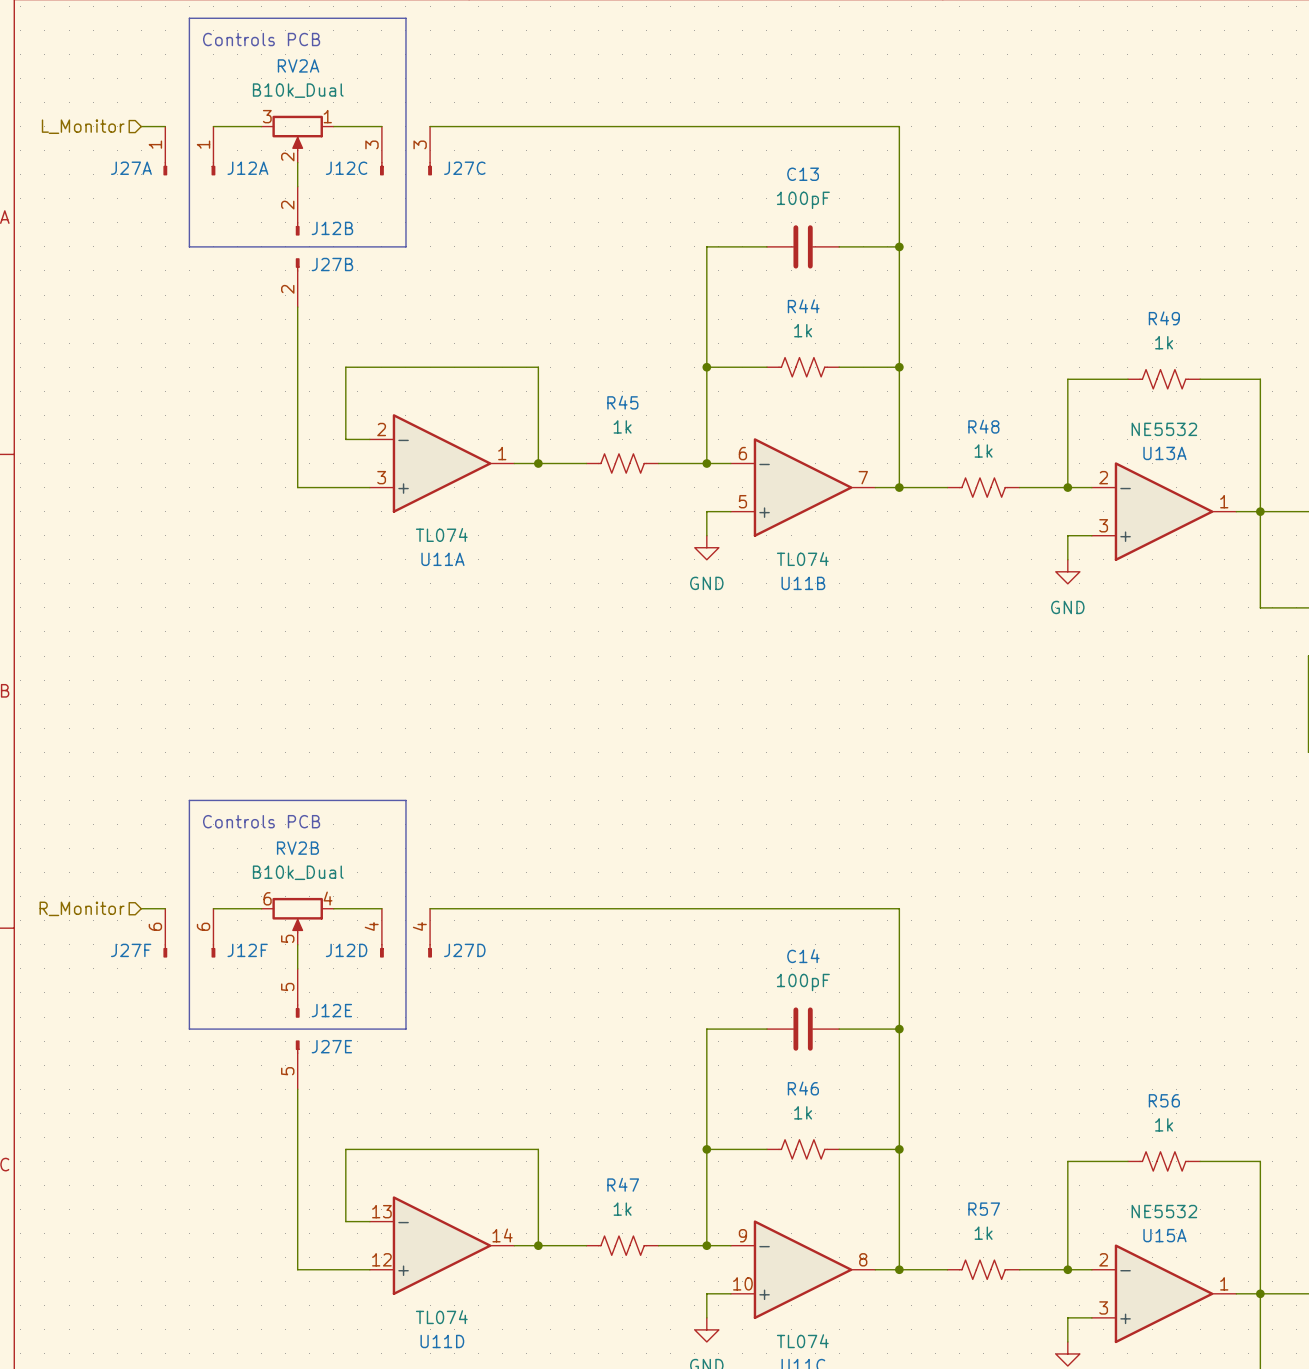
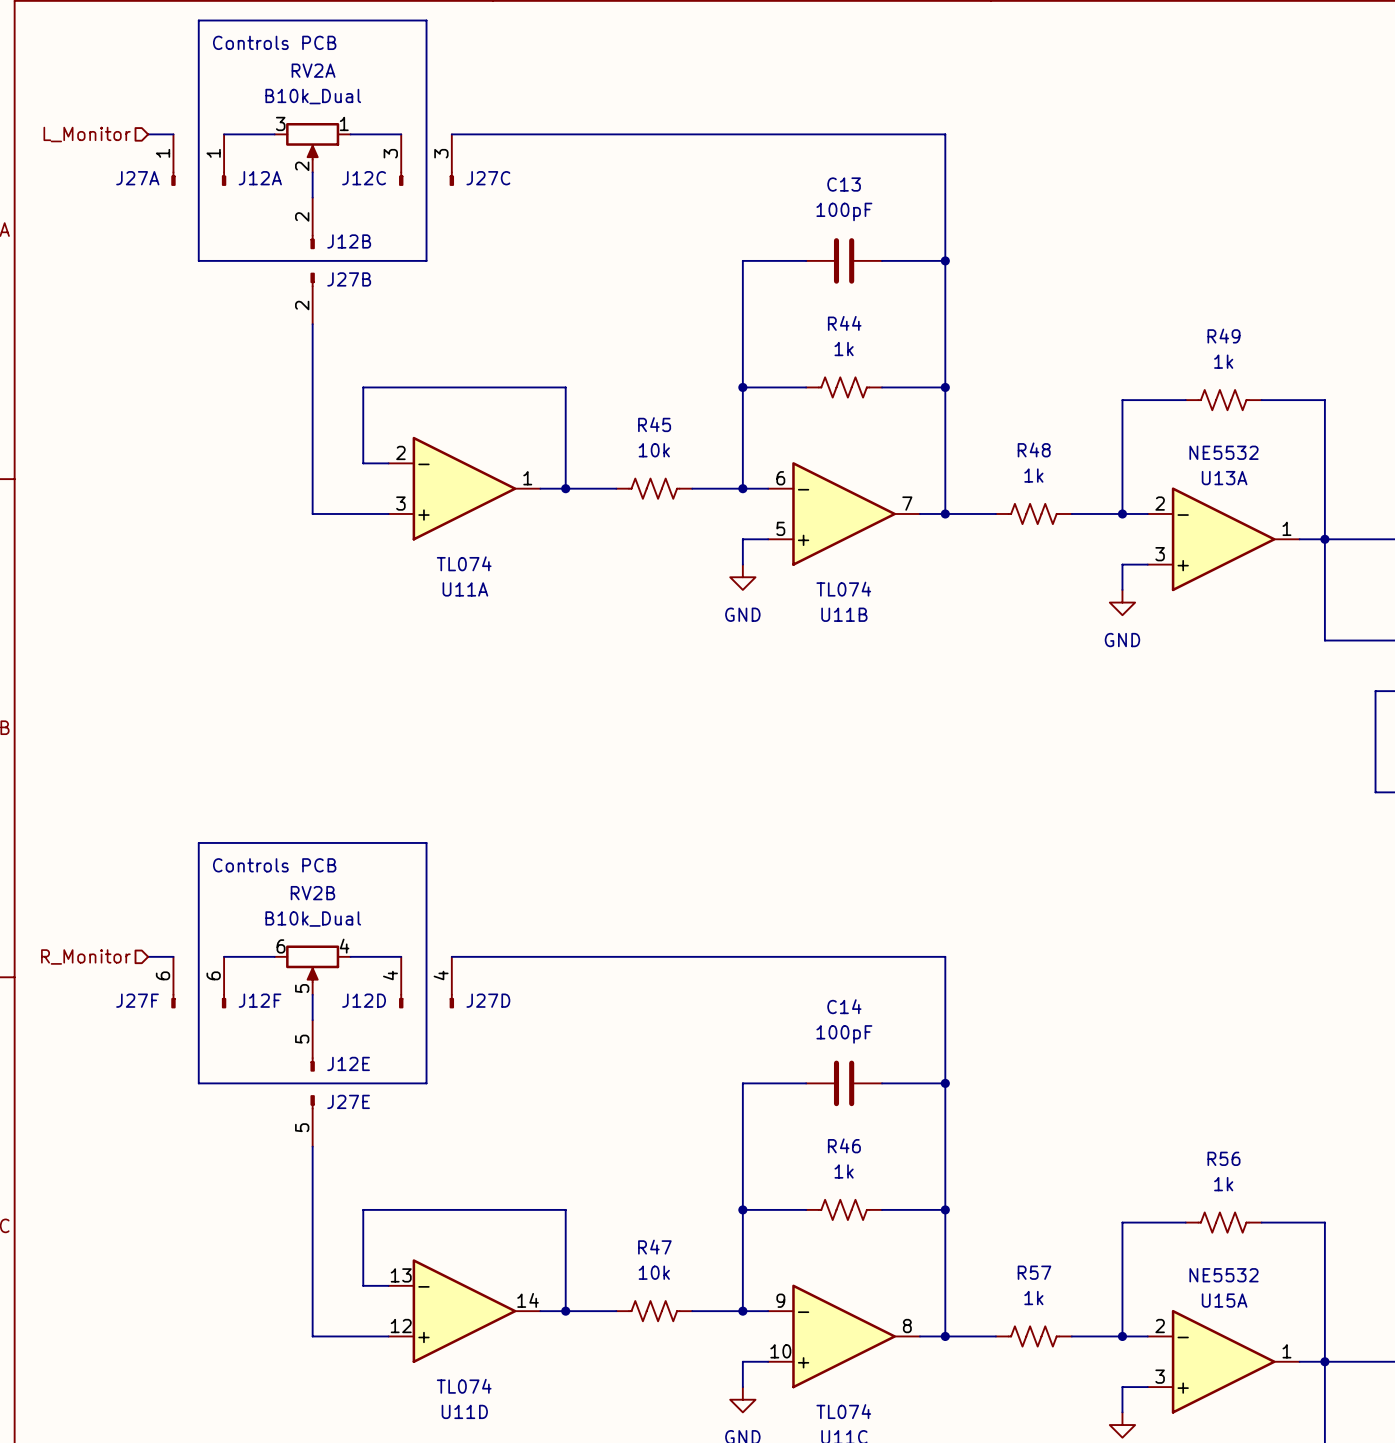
R45 value: 1k (622, 426) -> 10k (654, 450)
R47 value: 1k (622, 1209) -> 10k (654, 1272)

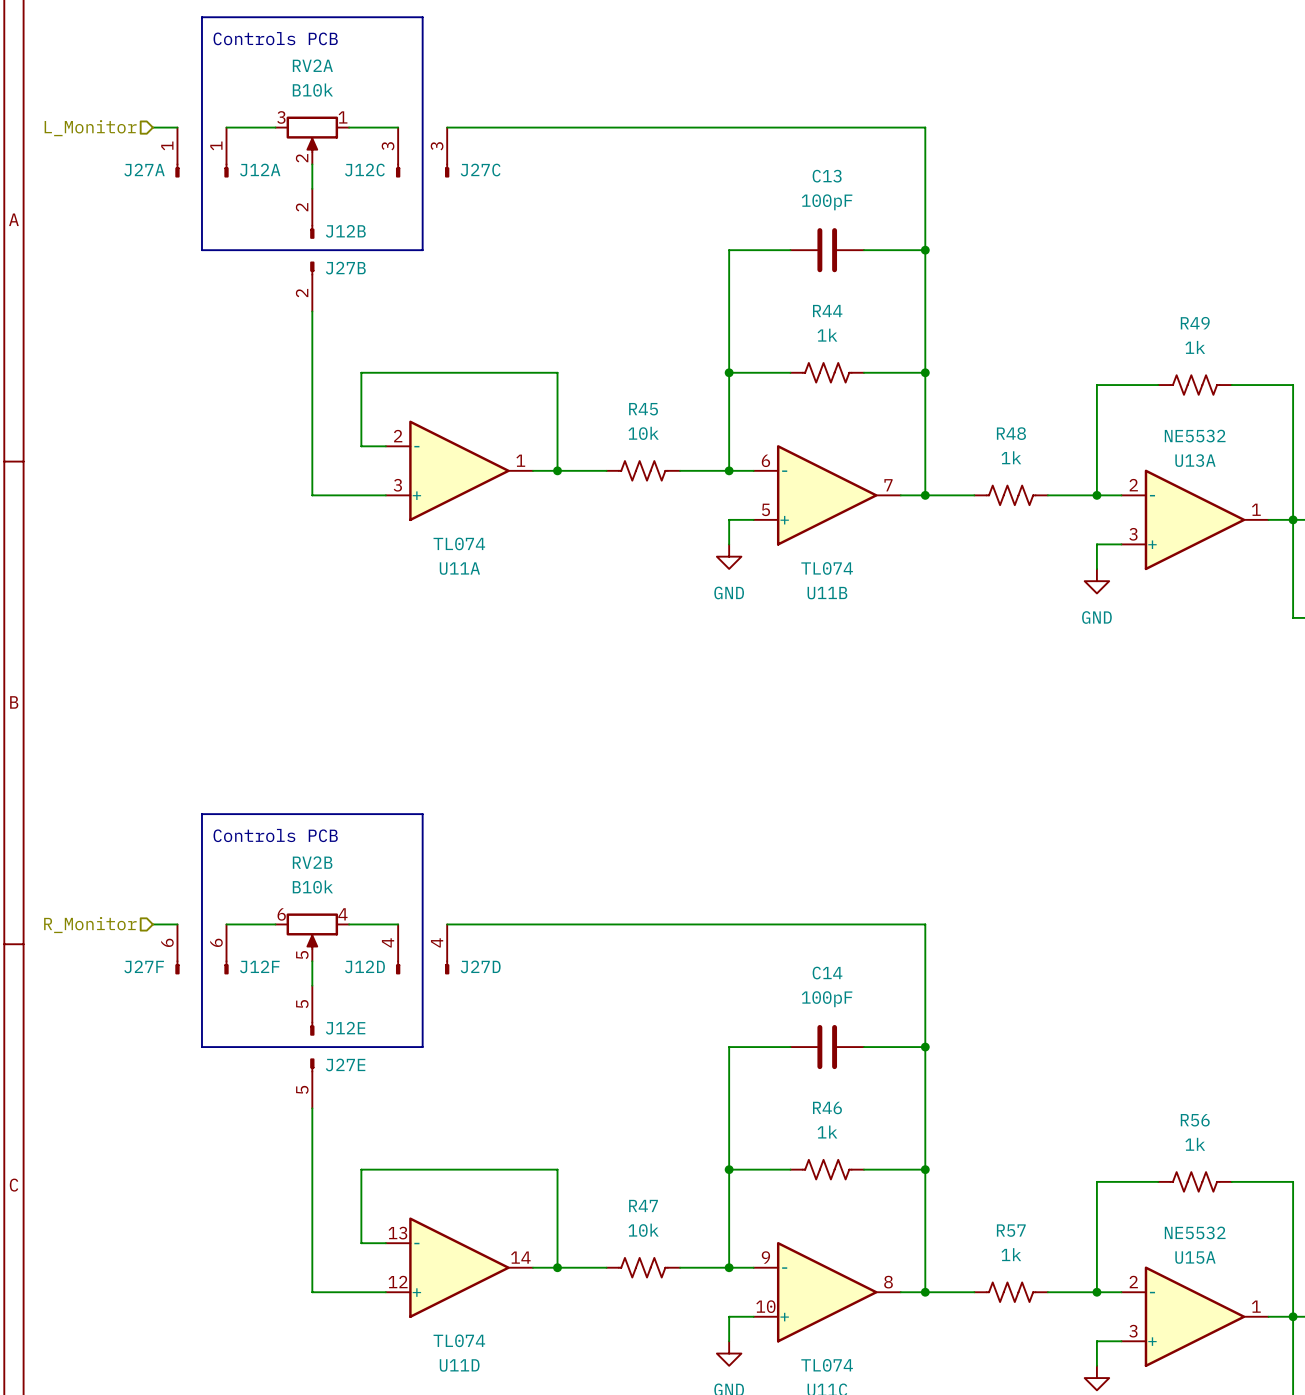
RV2A value: B10k_Dual (313, 96) -> B10k (312, 90)
RV2B value: B10k_Dual (313, 919) -> B10k (312, 886)

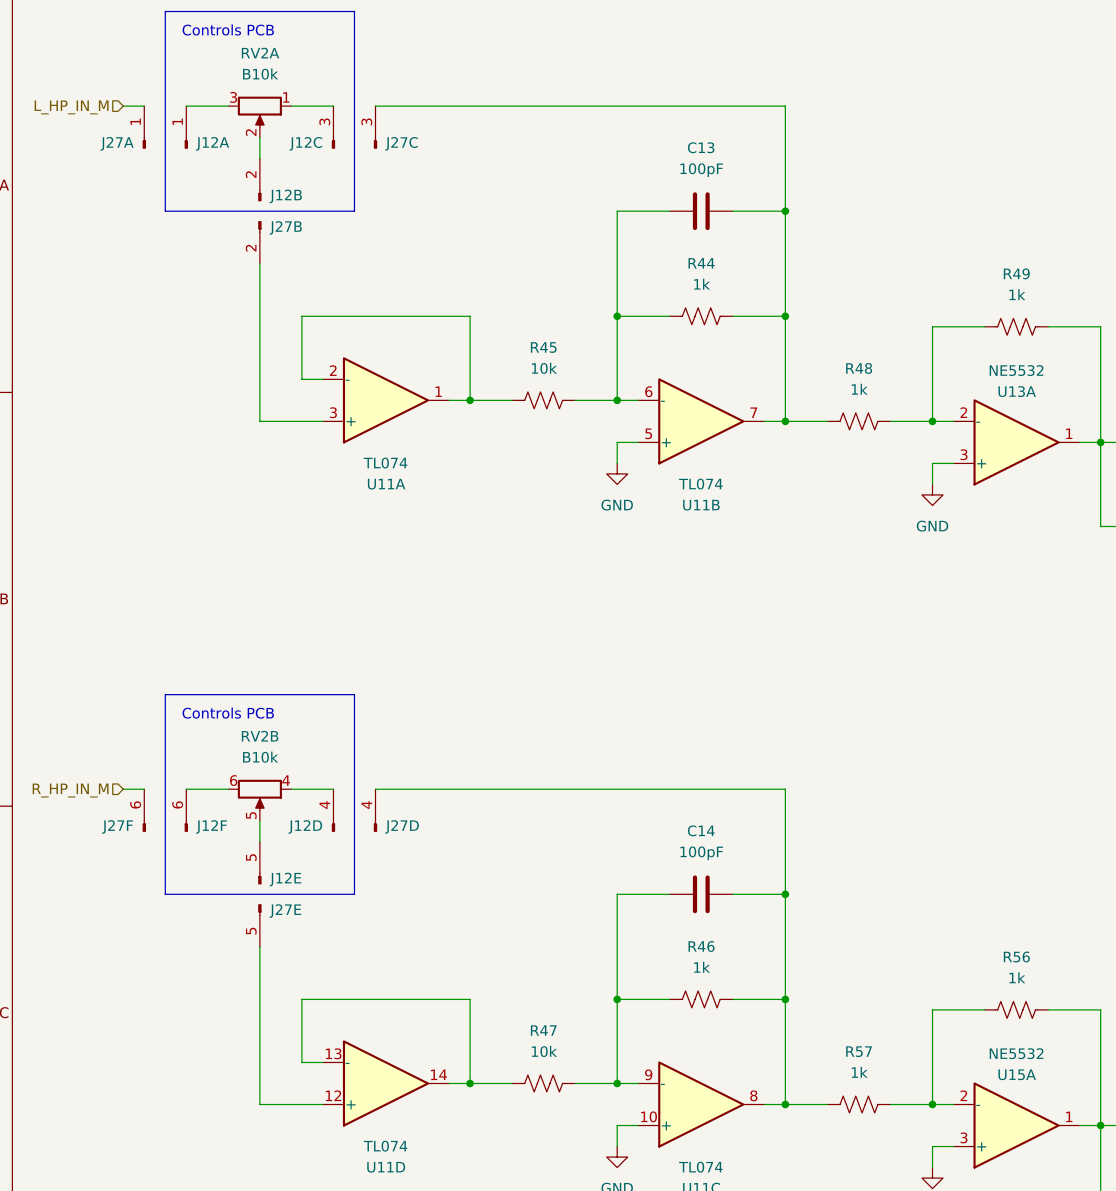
hierarchical label: L_Monitor (90, 128) -> L_HP_IN_M (71, 107)
hierarchical label: R_Monitor (90, 925) -> R_HP_IN_M (70, 790)

